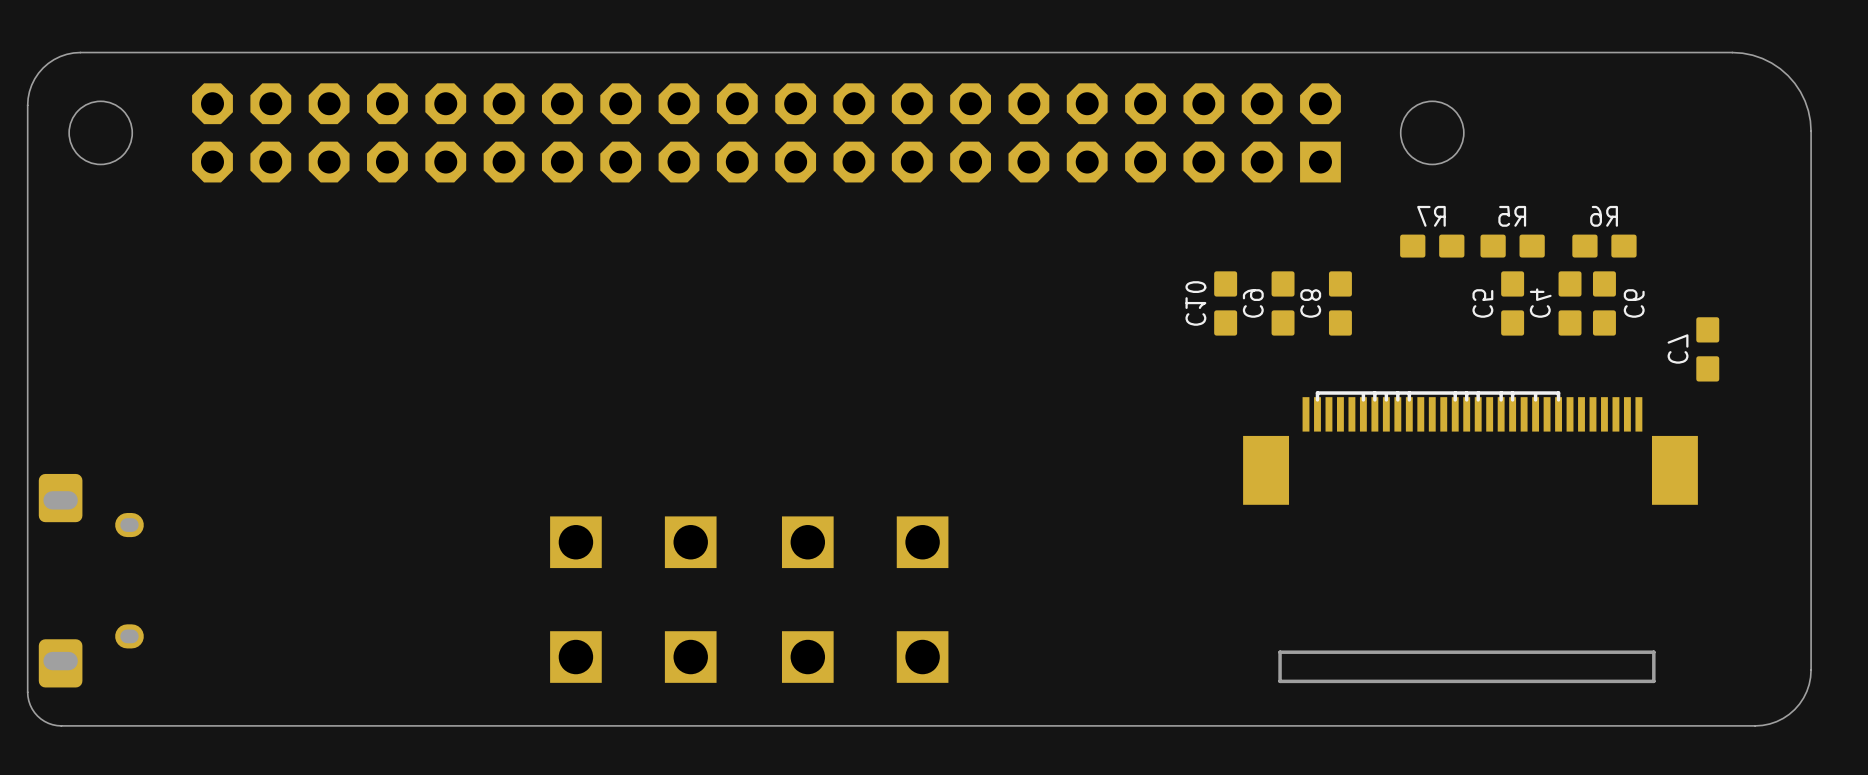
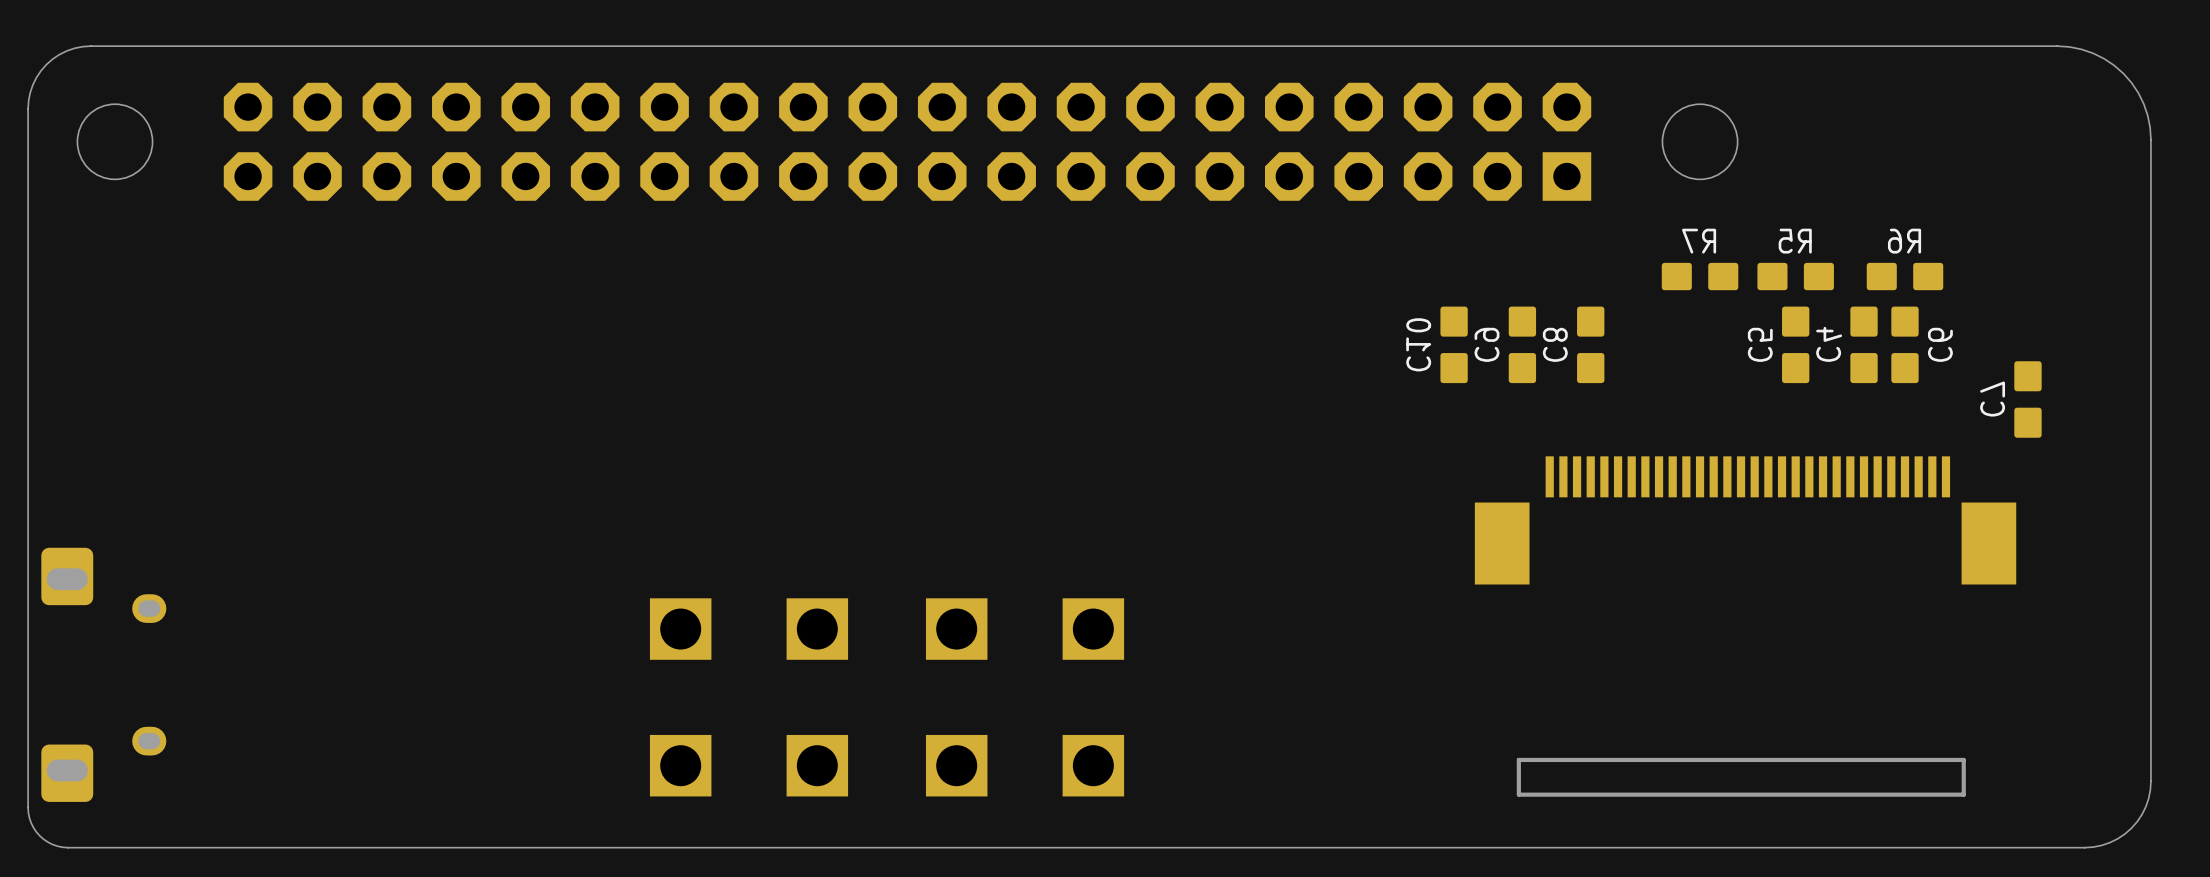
line: (1374, 393) (1374, 399) -> none
line: (1397, 393) (1397, 399) -> none
line: (1409, 393) (1409, 399) -> none
line: (1455, 393) (1455, 399) -> none
line: (1466, 393) (1466, 399) -> none
line: (1478, 393) (1478, 399) -> none
line: (1501, 393) (1501, 399) -> none
line: (1512, 393) (1512, 399) -> none
line: (1363, 395) (1363, 399) -> none
line: (1386, 395) (1386, 399) -> none
line: (1535, 395) (1535, 399) -> none
line: (1558, 399) (1558, 393) (1317, 393) (1317, 399) -> none

